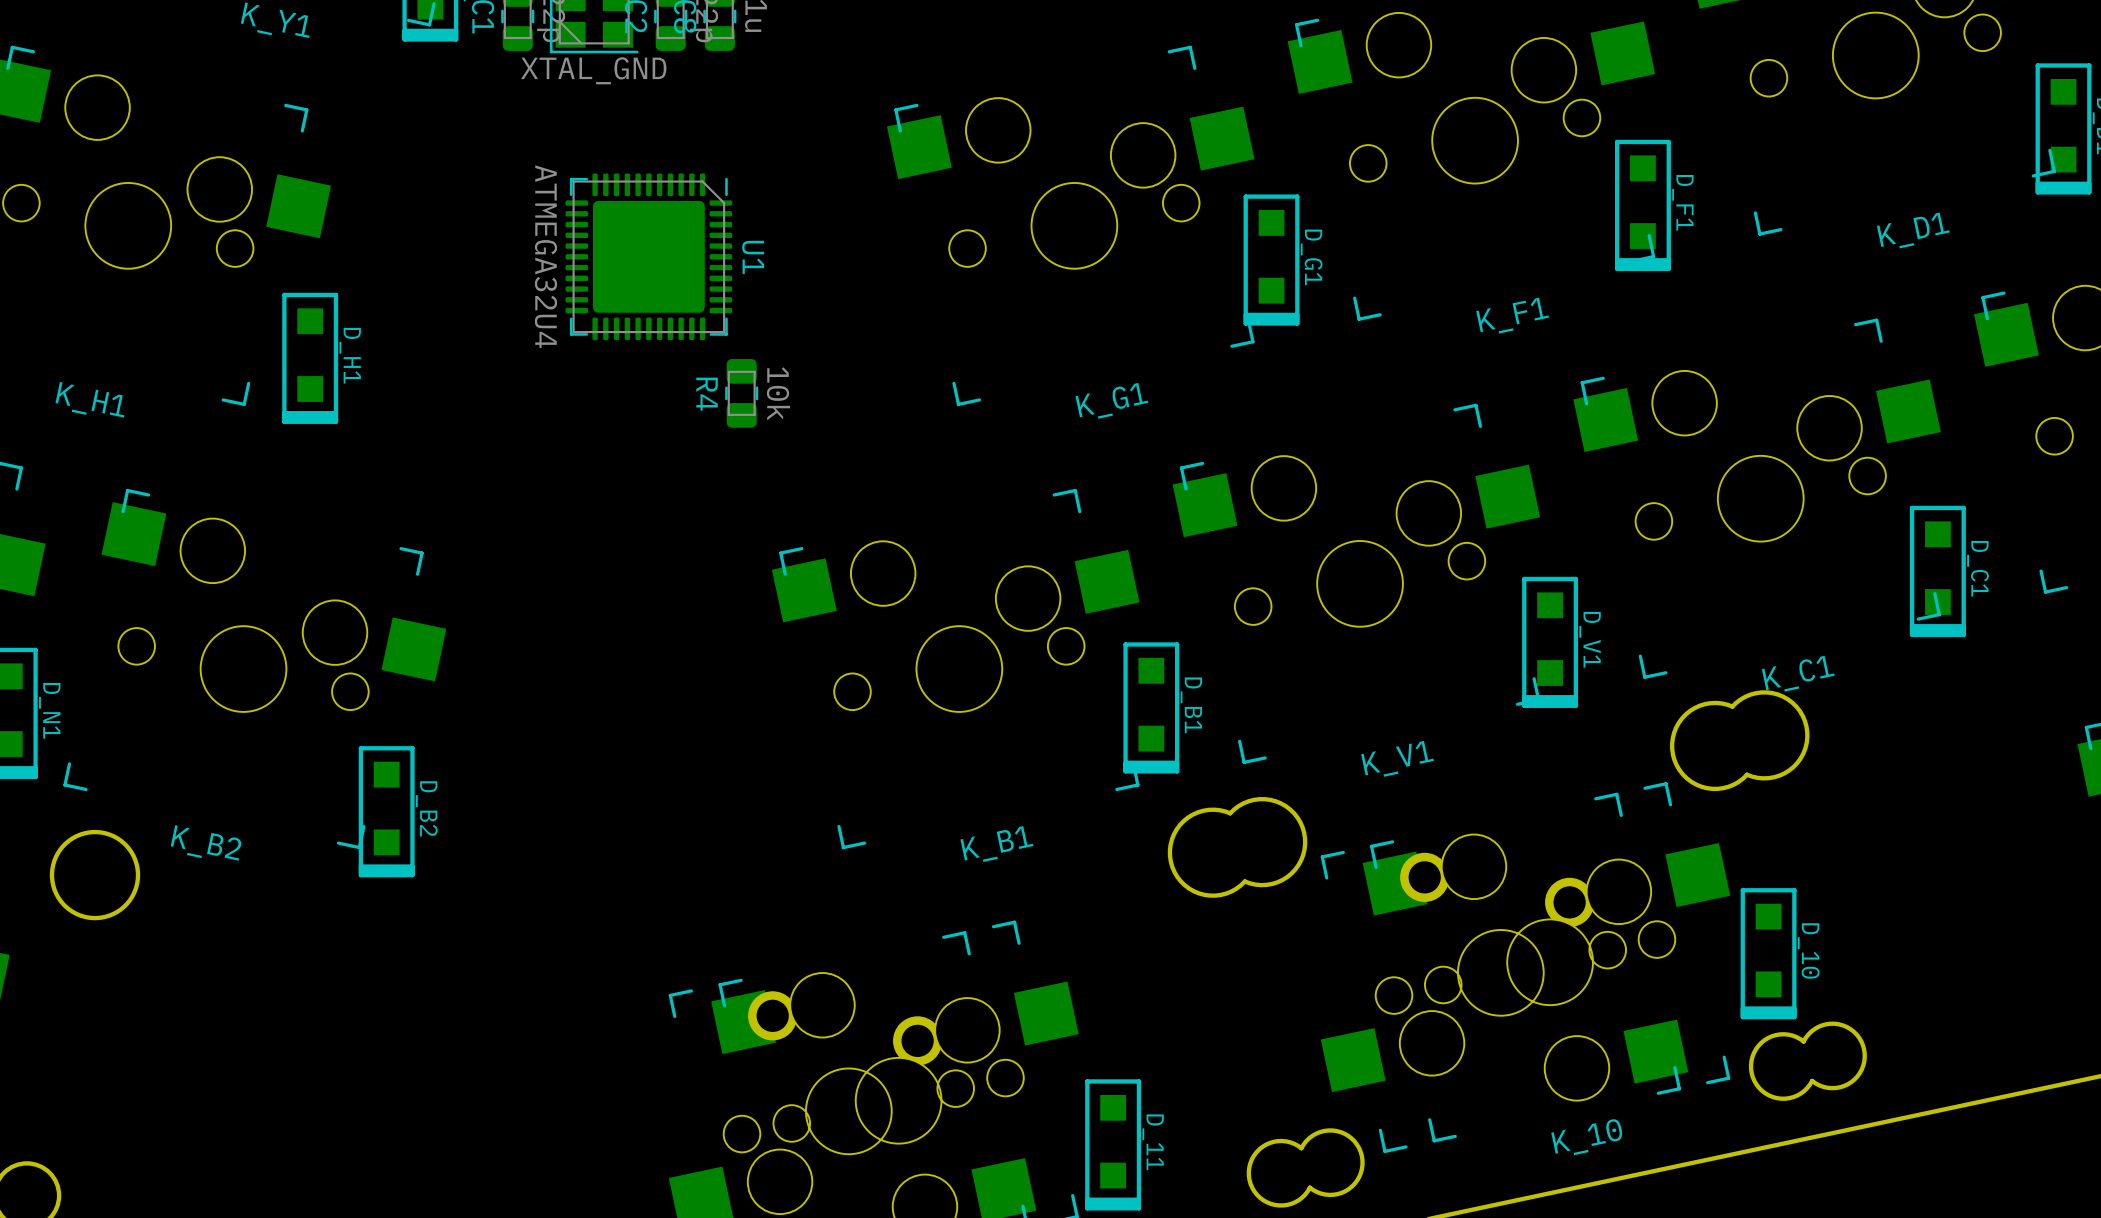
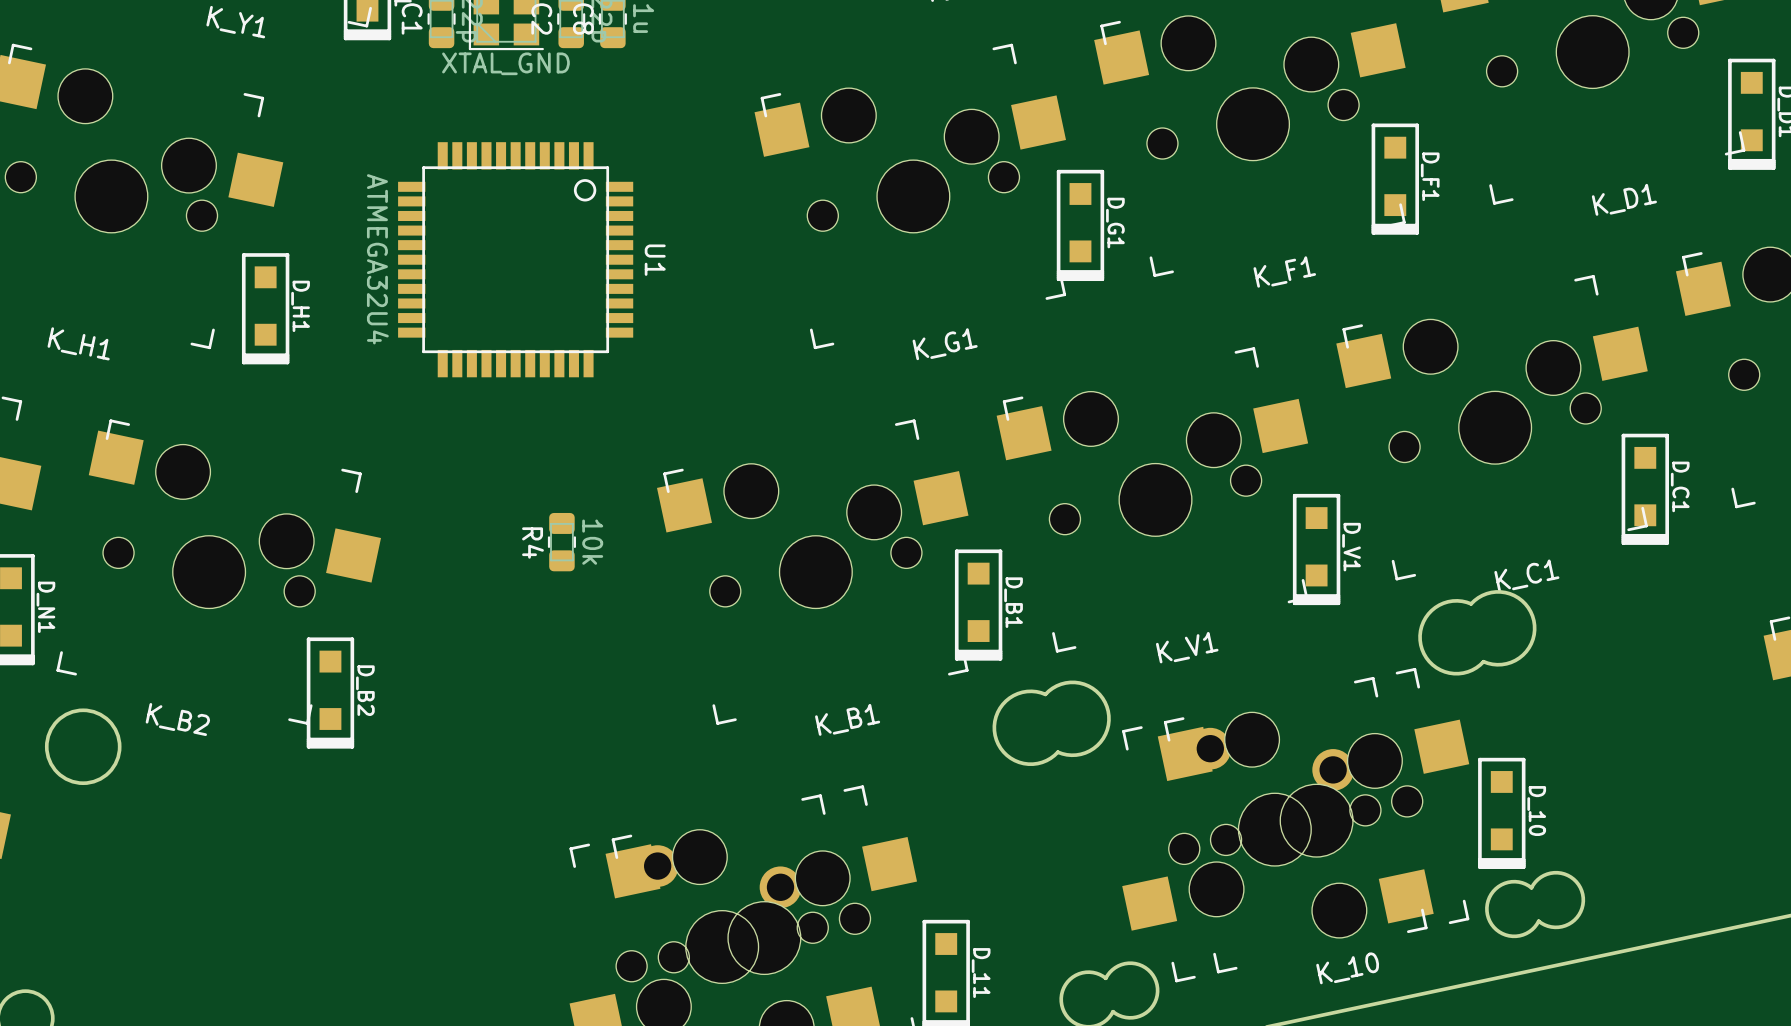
U1 footprint: [565, 173, 733, 341] -> [398, 142, 634, 378]
U1 value position: ATMEGA32U4 (546, 256) -> ATMEGA32U4 (377, 259)
U1 name position: U1 (753, 257) -> U1 (655, 260)
R4 position: (741, 393) -> (561, 542)

